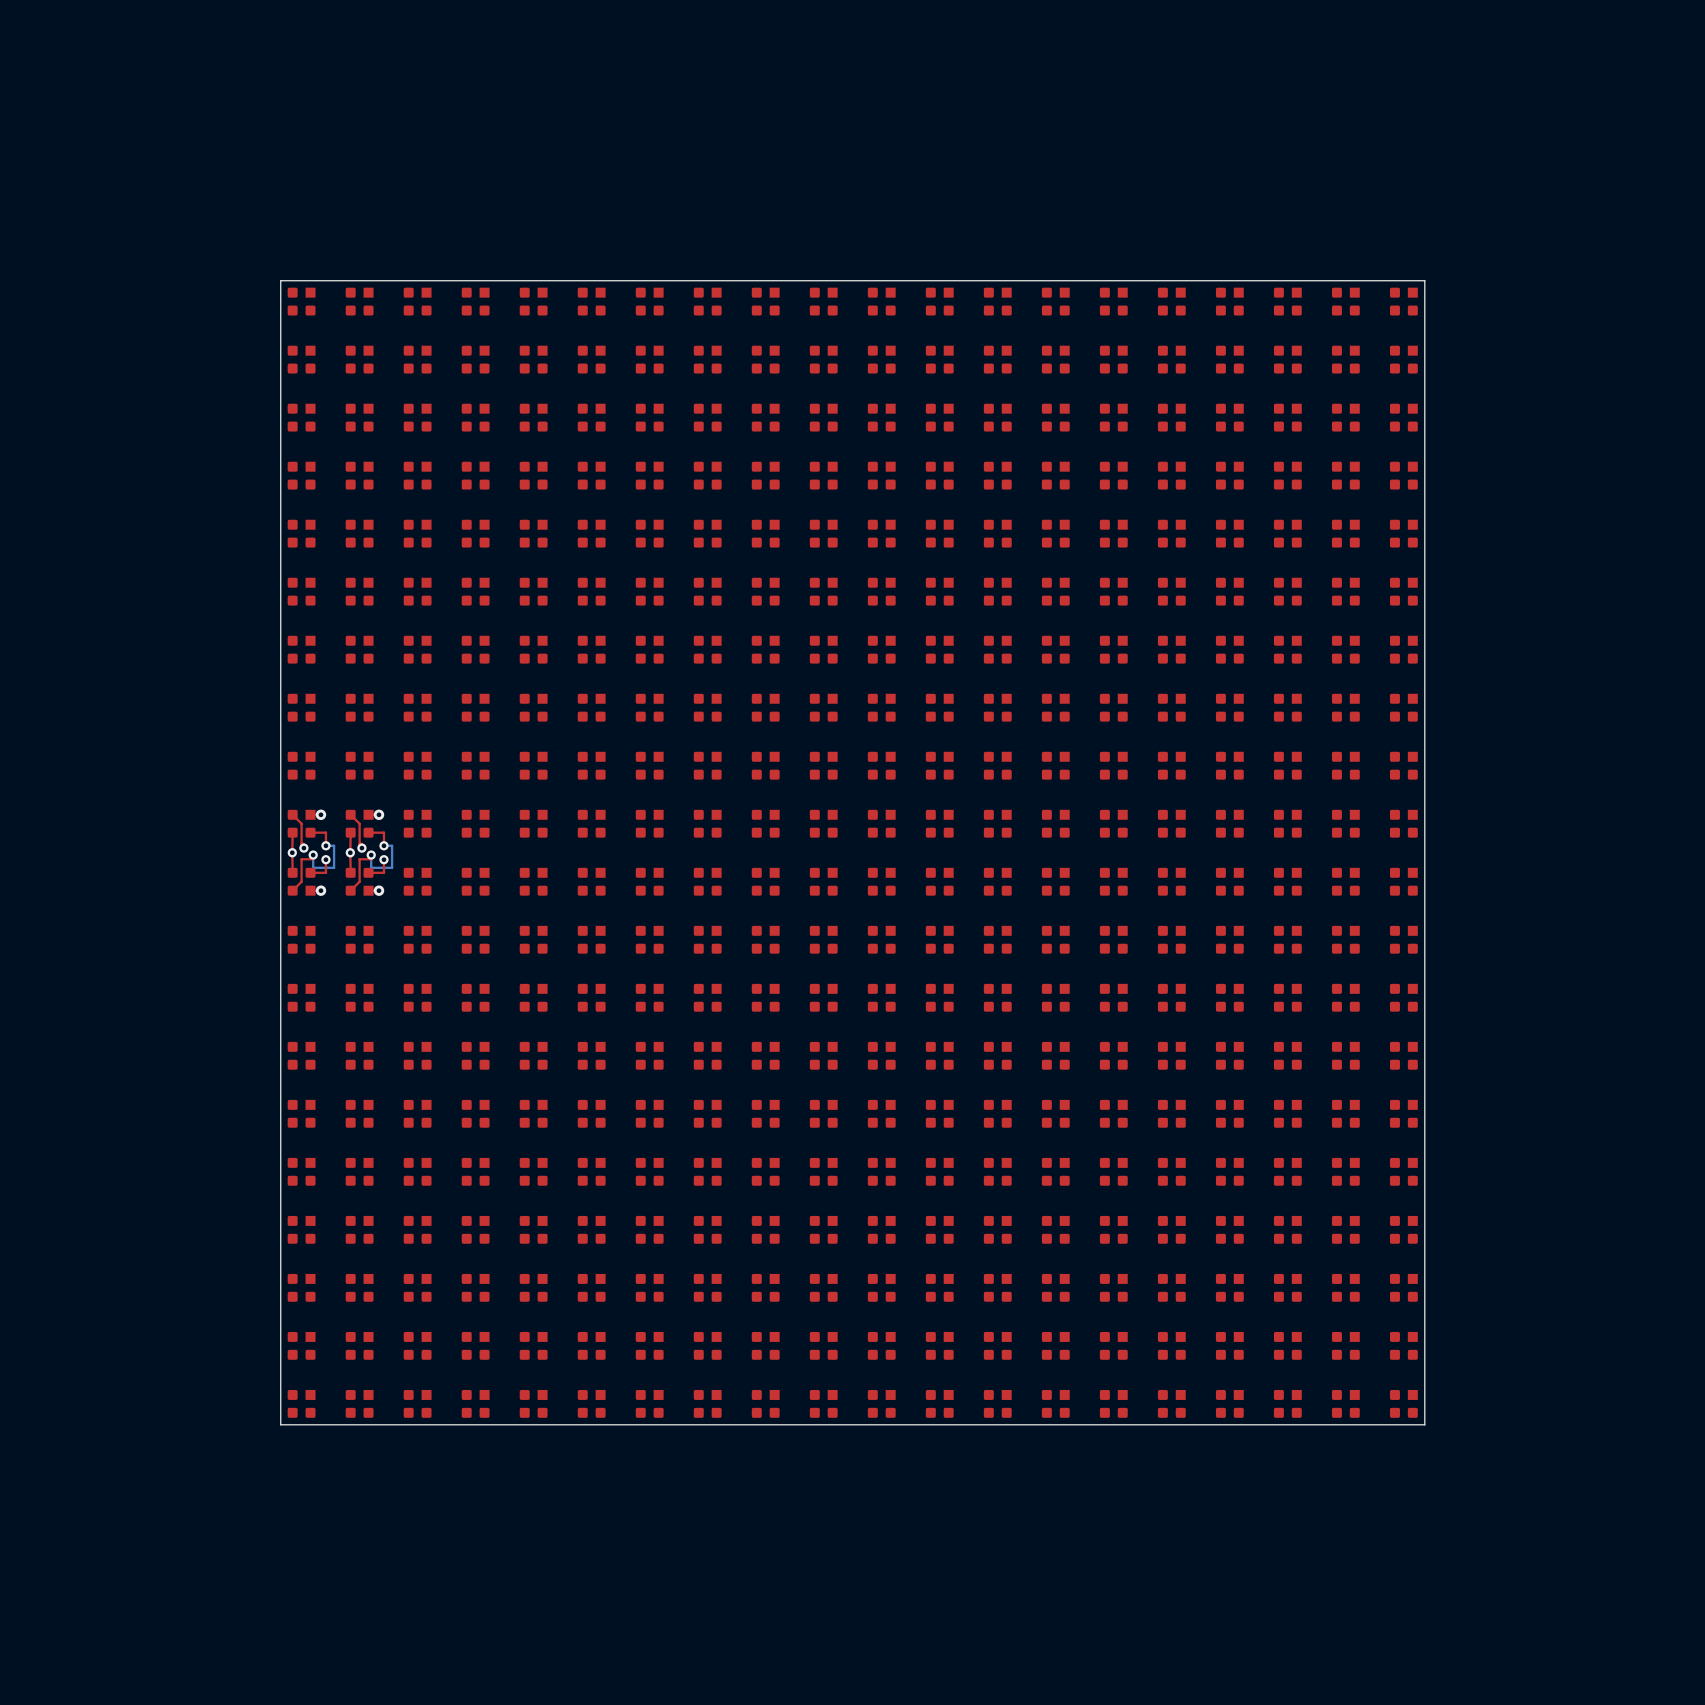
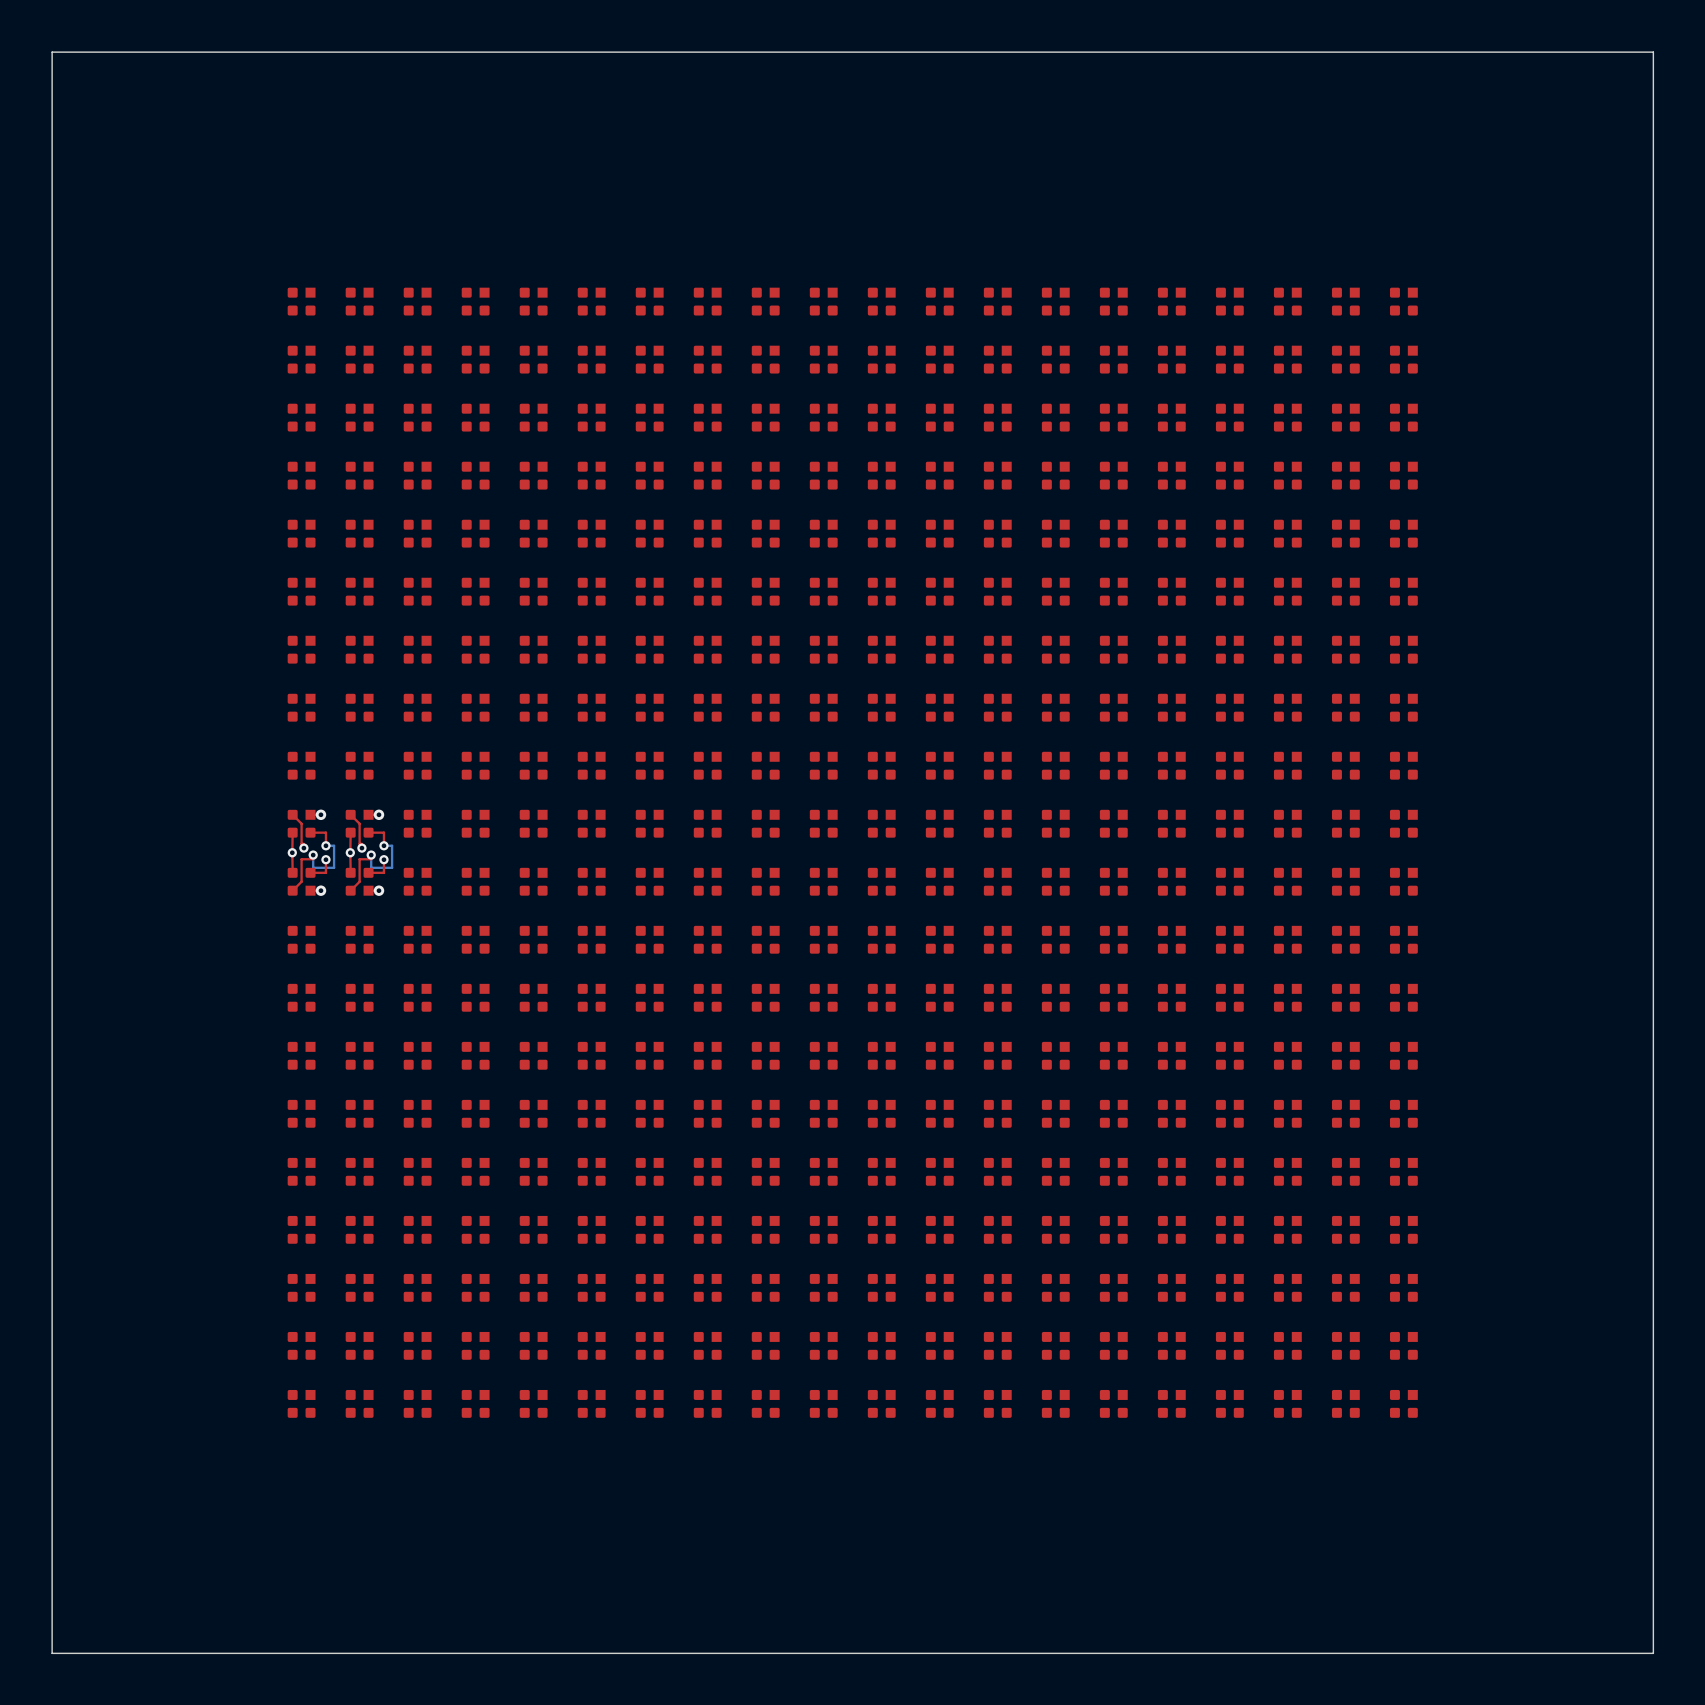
board edge: (280, 280) (1424, 280) (1424, 1424) (280, 1424) (280, 280) -> (52, 52) (52, 1653) (1653, 1653) (1653, 52) (52, 52)

